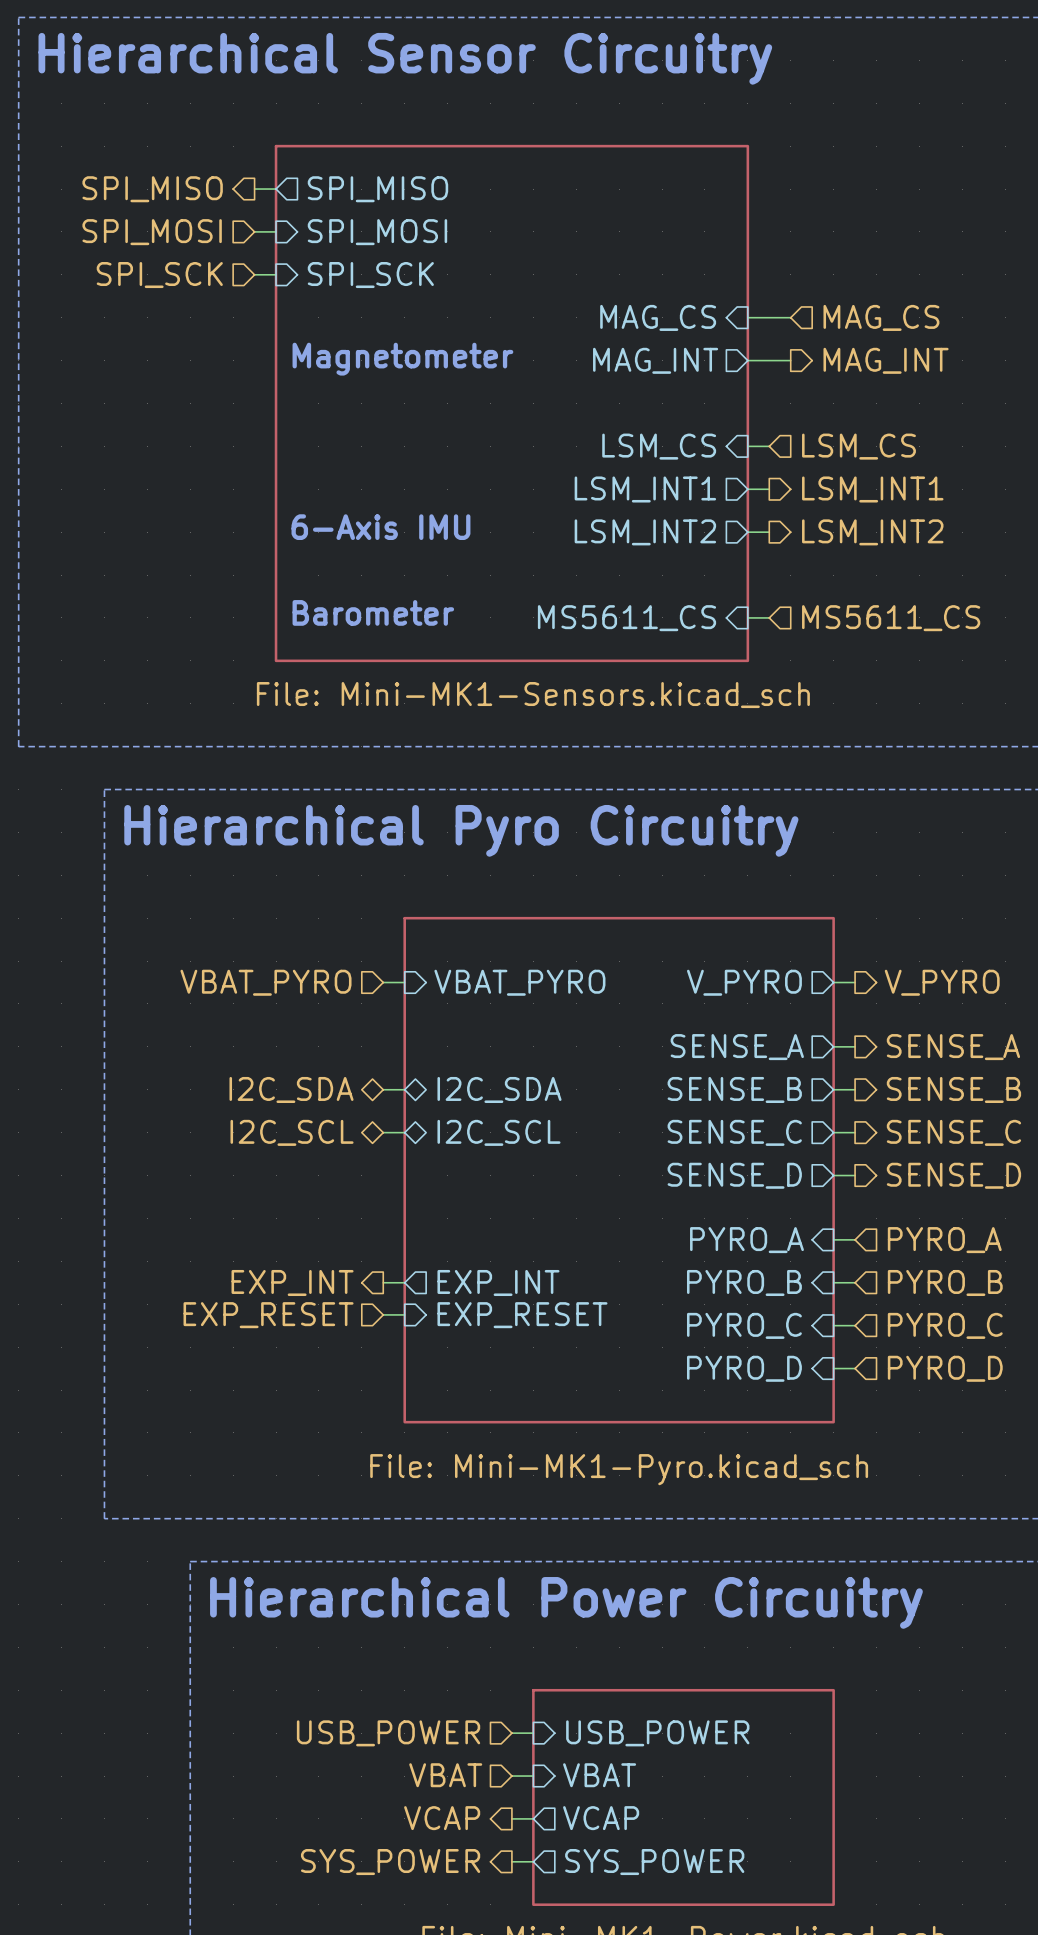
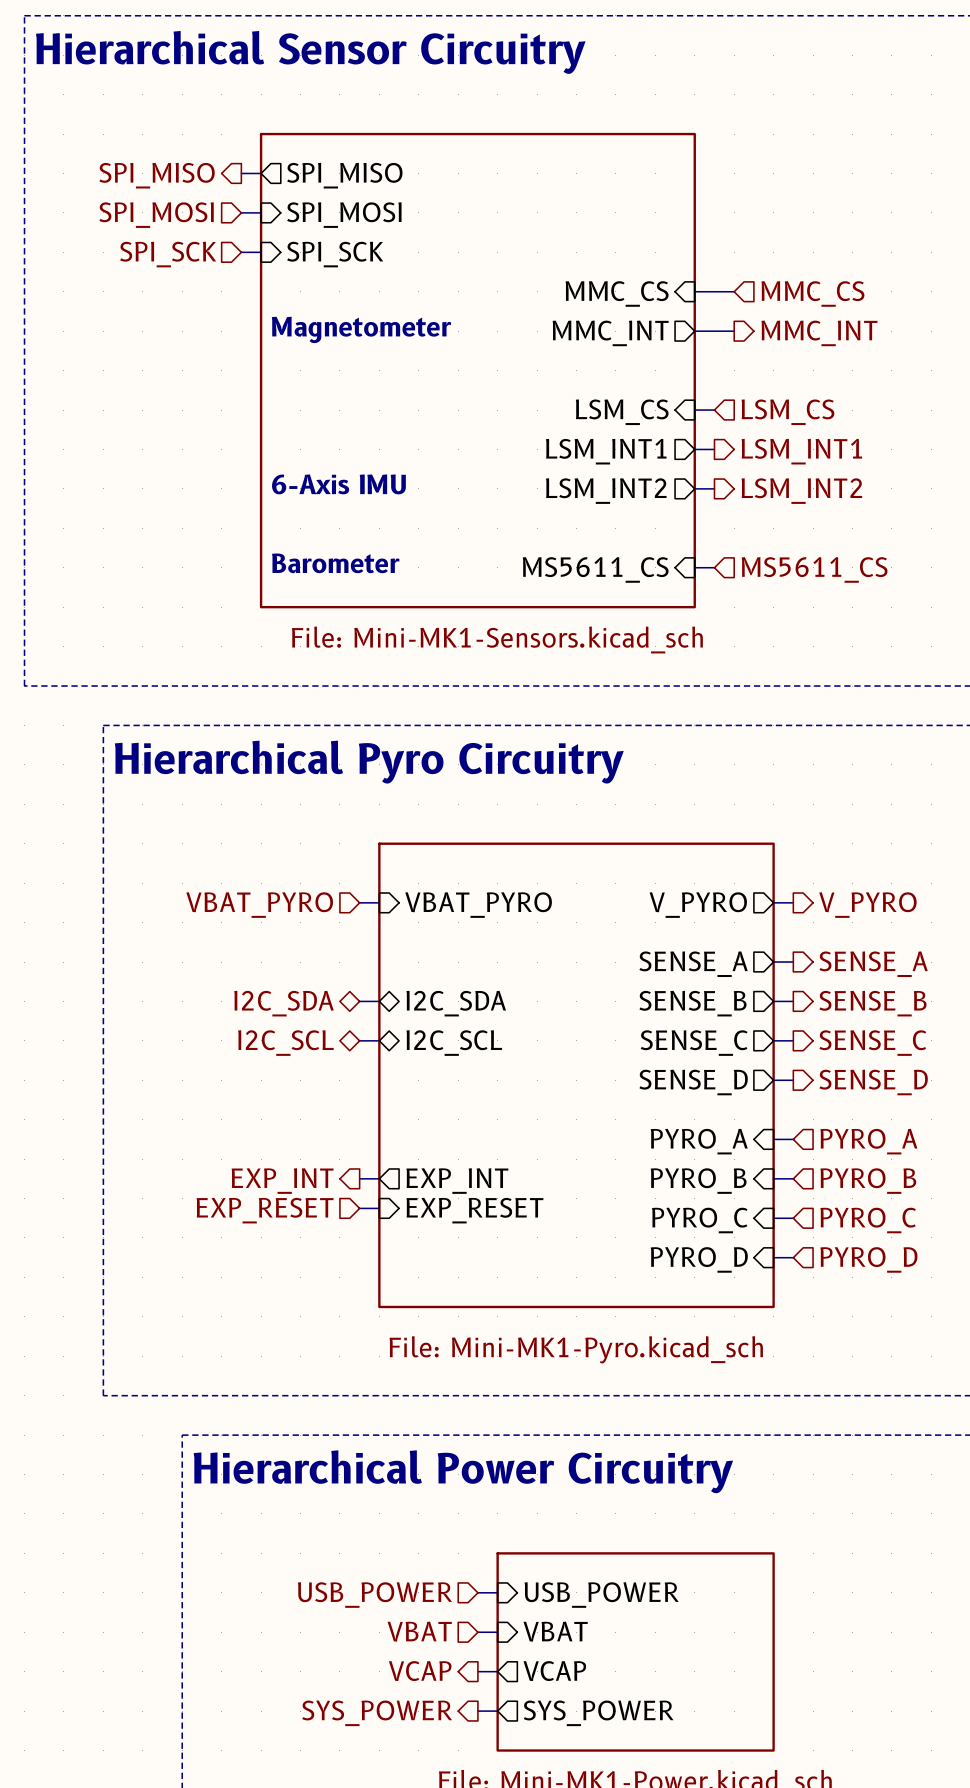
sheet pin: MAG_CS (658, 317) -> MMC_CS (617, 293)
hierarchical label: MAG_CS (881, 317) -> MMC_CS (812, 293)
sheet pin: MAG_INT (655, 360) -> MMC_INT (610, 333)
hierarchical label: MAG_INT (886, 360) -> MMC_INT (819, 333)

